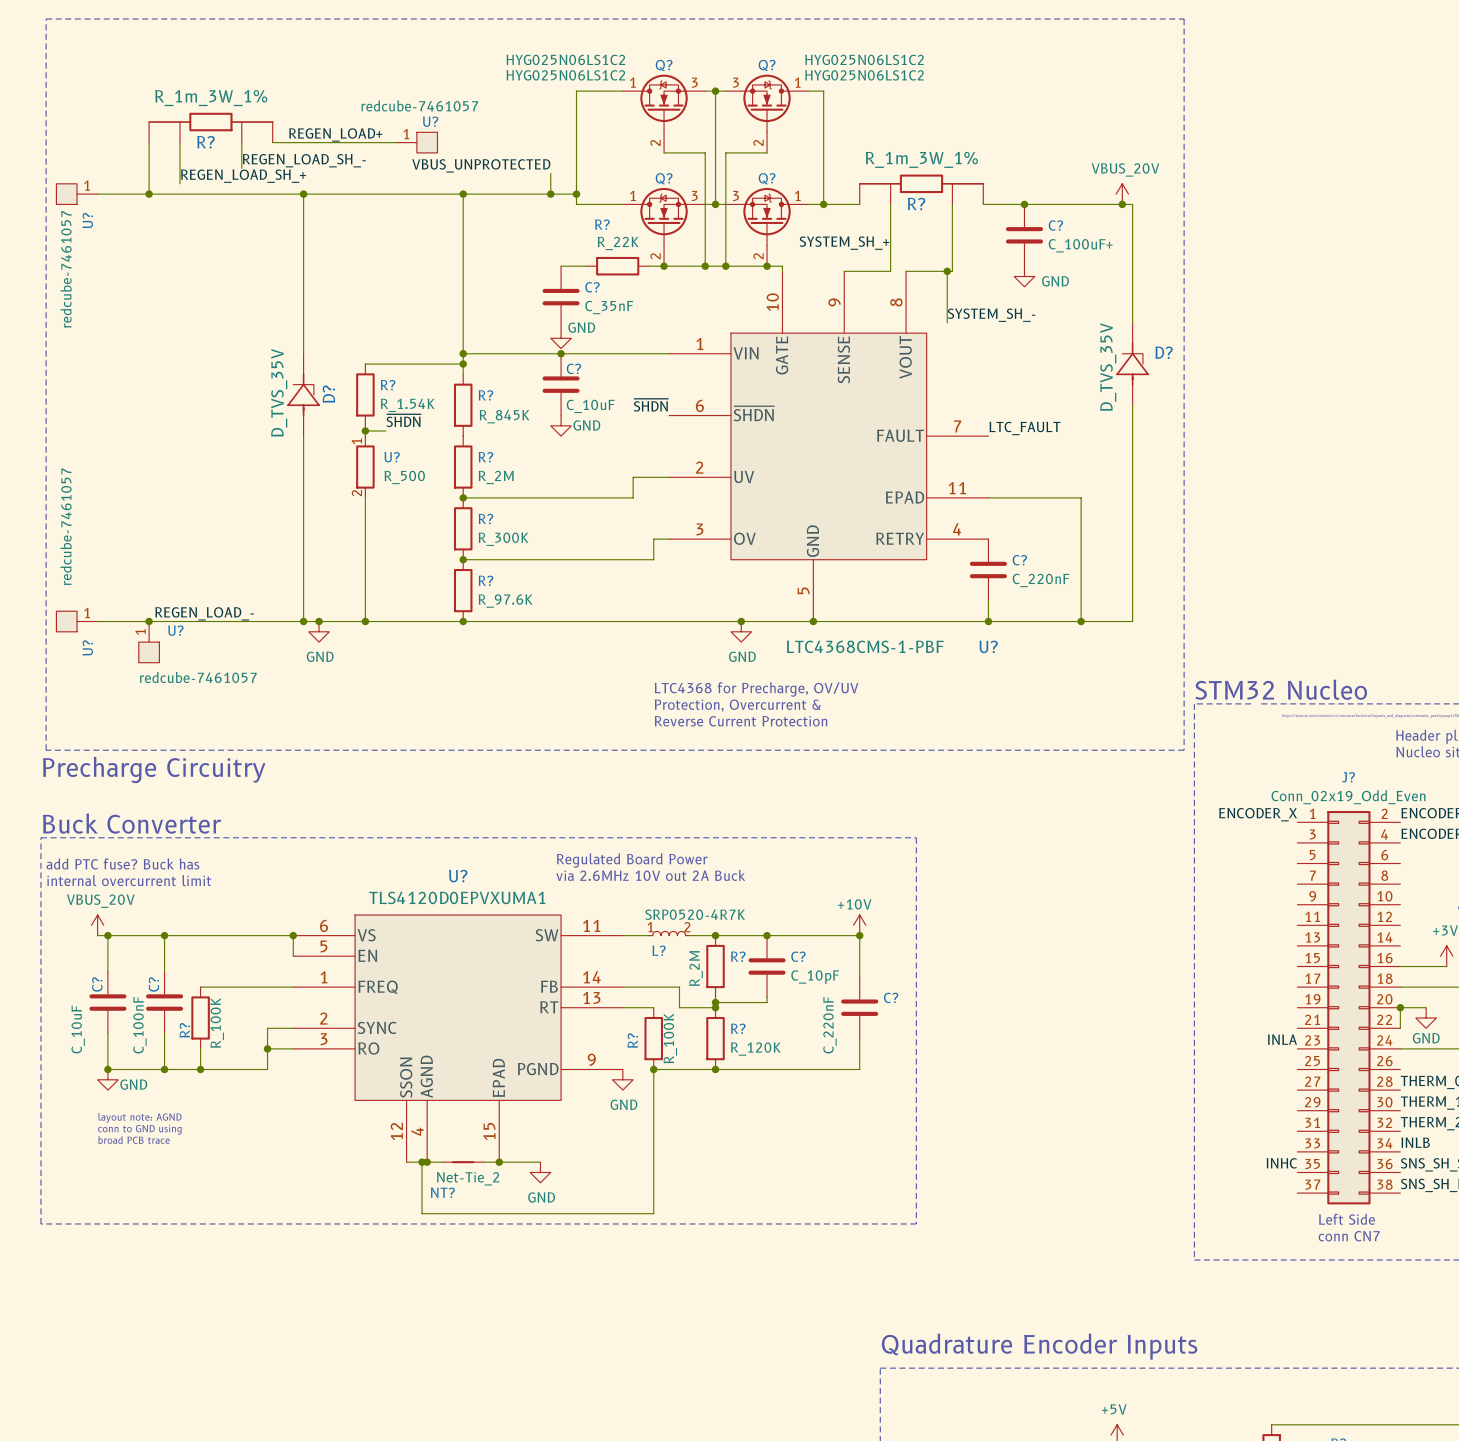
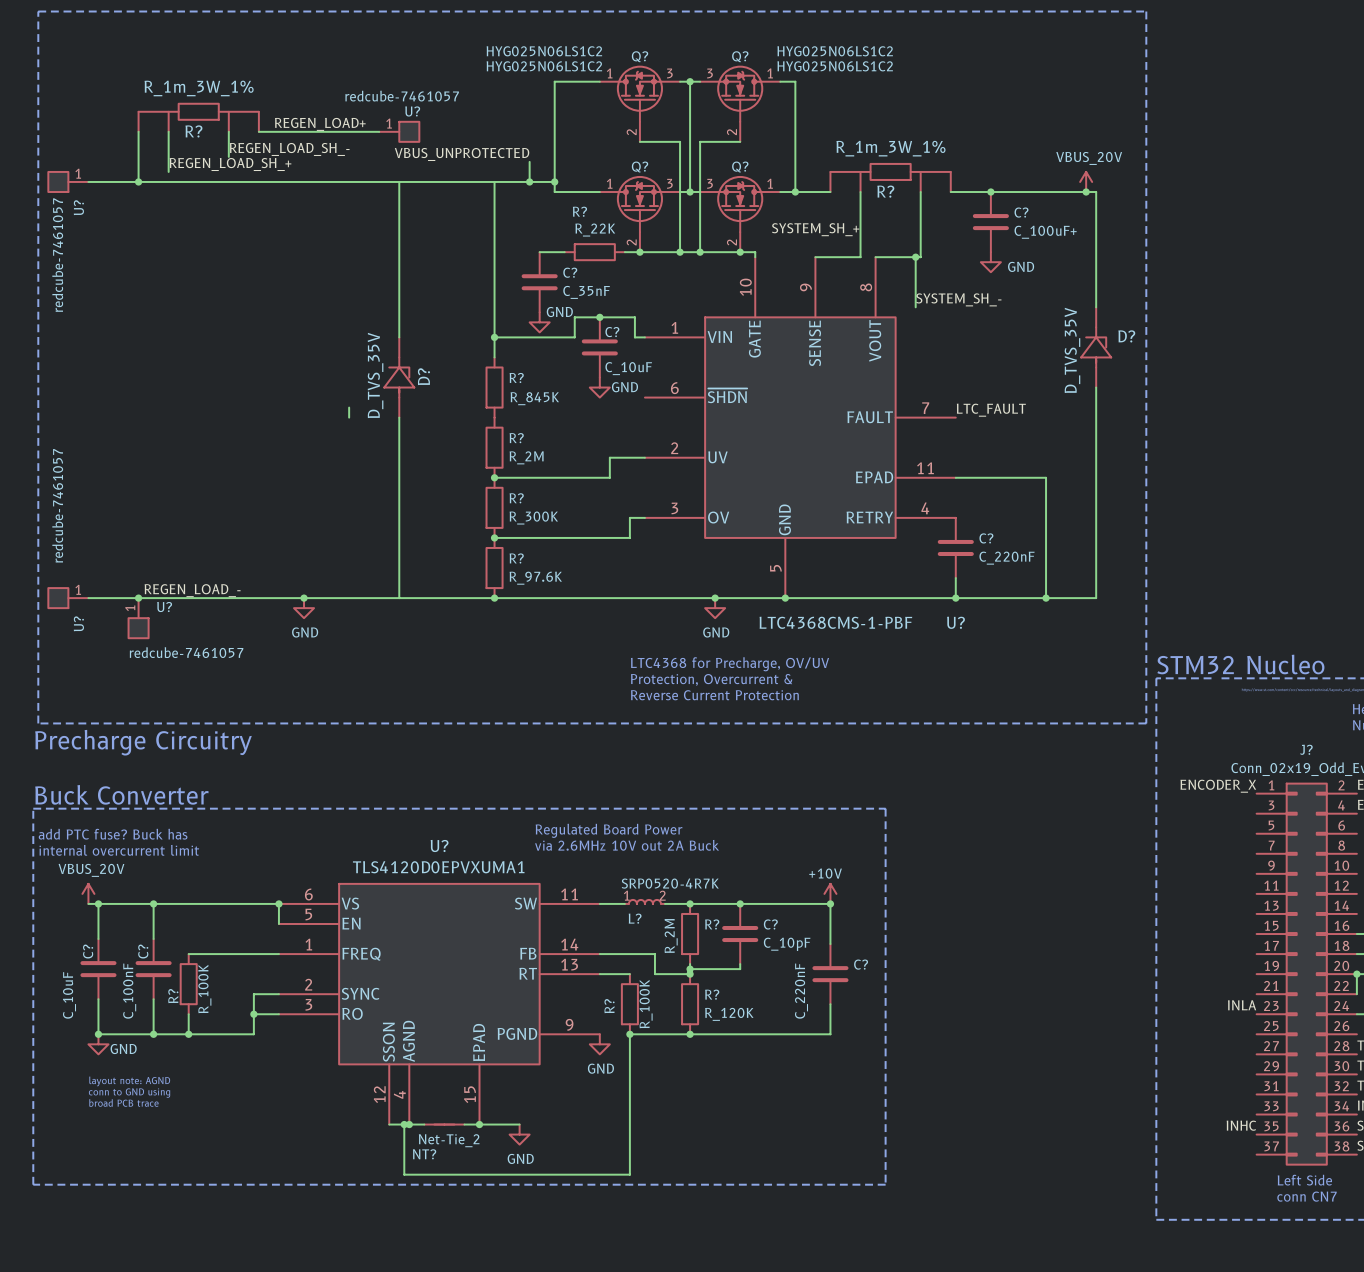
wire: (303, 194) (303, 353) -> (399, 181) (399, 337)
junction: (303, 194) -> none
wire: (463, 194) (463, 374) -> (494, 181) (494, 357)
junction: (463, 194) -> none
junction: none -> (599, 317)
wire: (463, 353) (514, 353) -> none
junction: (463, 353) -> none
junction: none -> (494, 337)
junction: (561, 353) -> none
wire: (597, 353) (658, 353) -> (574, 337) (574, 317) (634, 317) (634, 337)
wire: (365, 364) (463, 364) -> none
junction: (463, 364) -> none
C? position: (561, 384) -> (599, 347)
D? position: (303, 394) -> (399, 377)
R?: R_1.54K (365, 394) -> none
R? position: (463, 405) -> (494, 387)
label: ~{SHDN} (650, 405) -> none
label: ~{SHDN} (403, 420) -> none
power symbol position: GND (561, 425) -> GND (599, 387)
wire: (365, 430) (385, 430) -> none
junction: (365, 430) -> none
wire: (303, 436) (303, 621) -> (399, 417) (399, 598)
U?: R_500 (365, 467) -> none
R? position: (463, 467) -> (494, 447)
wire: (365, 497) (365, 621) -> none
wire: (463, 497) (514, 497) -> none
junction: (463, 497) -> none
junction: none -> (494, 477)
R? position: (463, 528) -> (494, 507)
wire: (463, 559) (514, 559) -> none
junction: (463, 559) -> none
junction: none -> (494, 537)
R? position: (463, 590) -> (494, 568)
junction: (303, 621) -> none
junction: (365, 621) -> none
junction: (463, 621) -> none
junction: none -> (494, 598)

